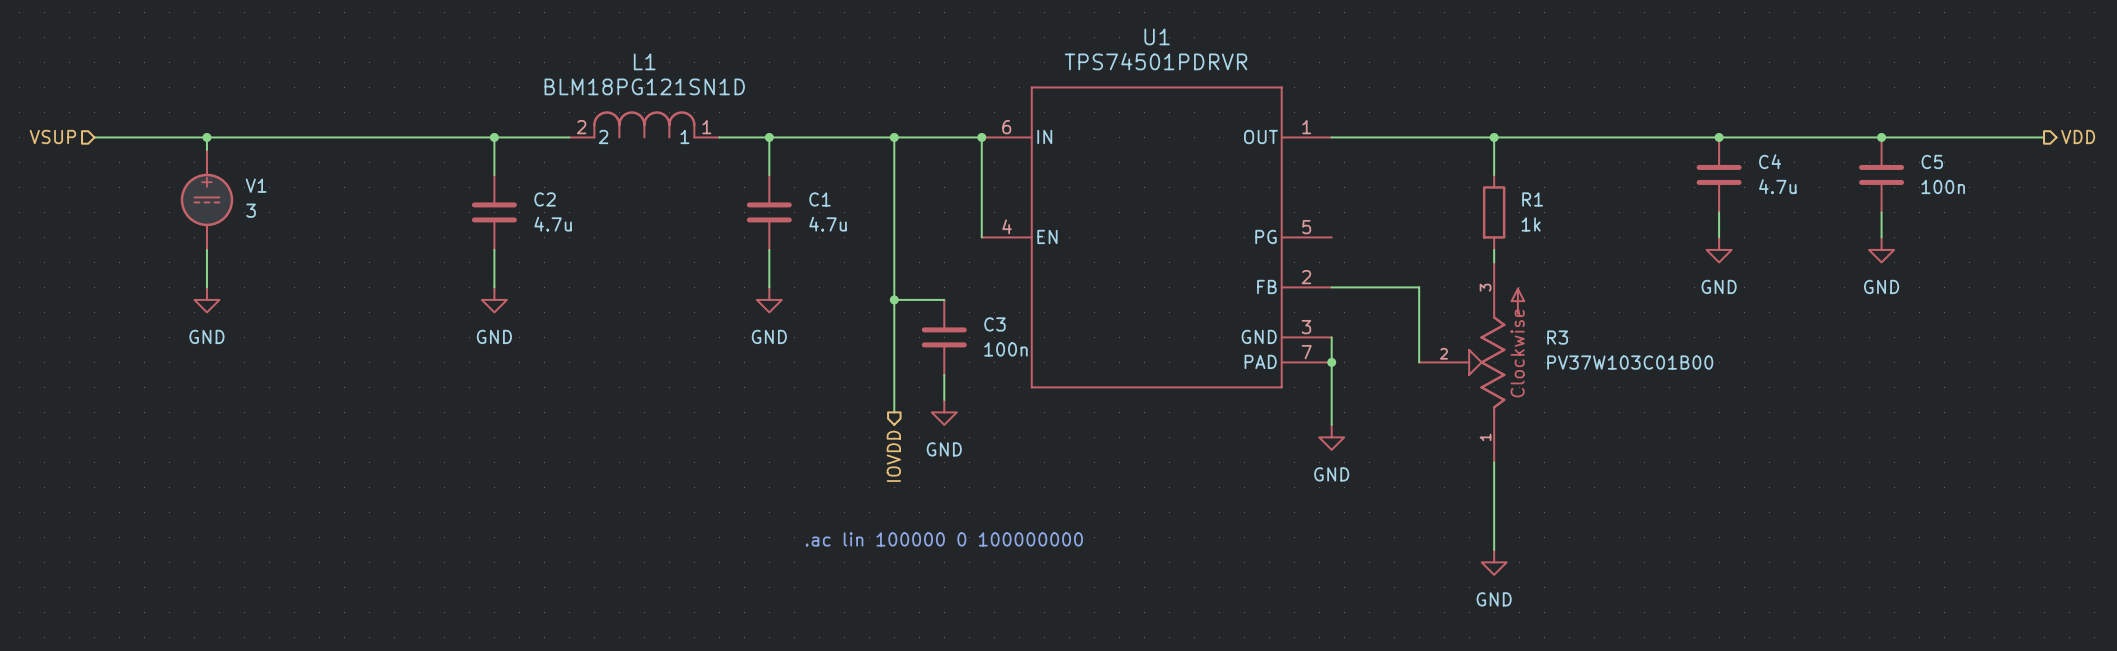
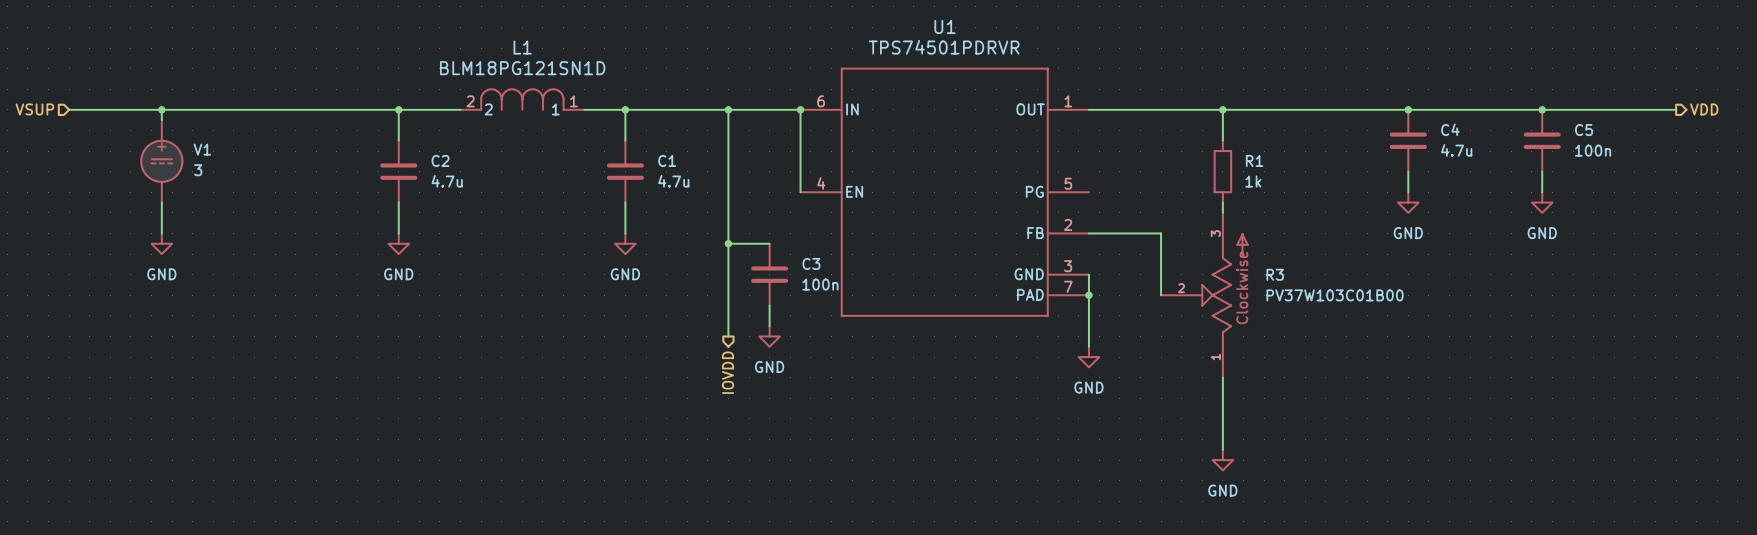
text: .ac lin 100000 0 100000000 (944, 539) -> none

